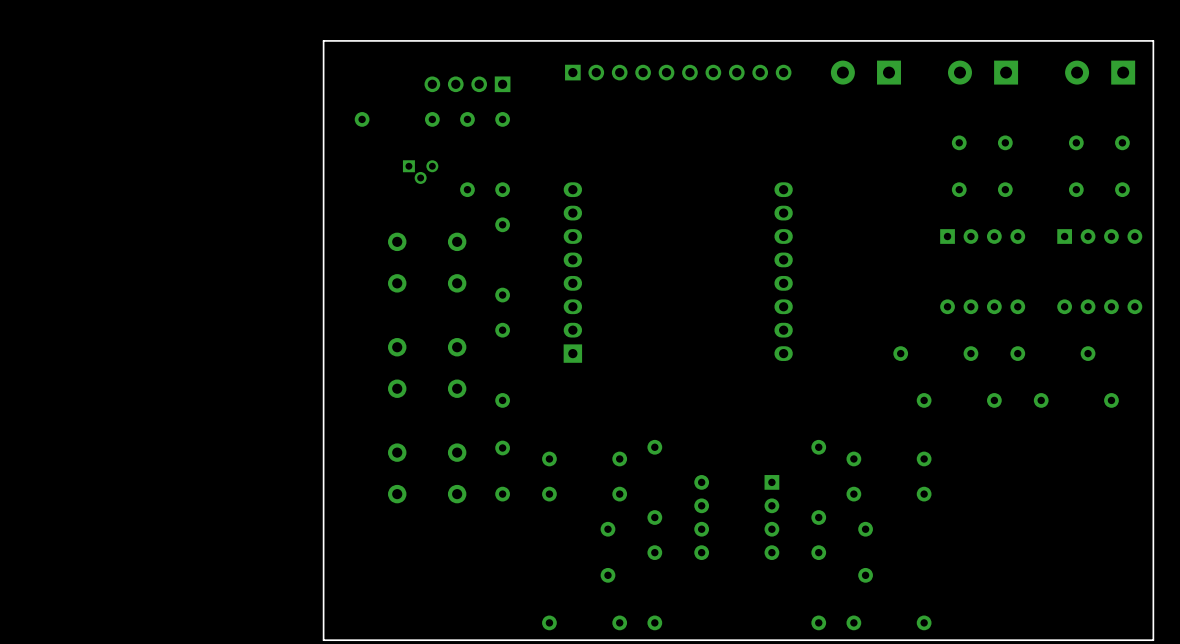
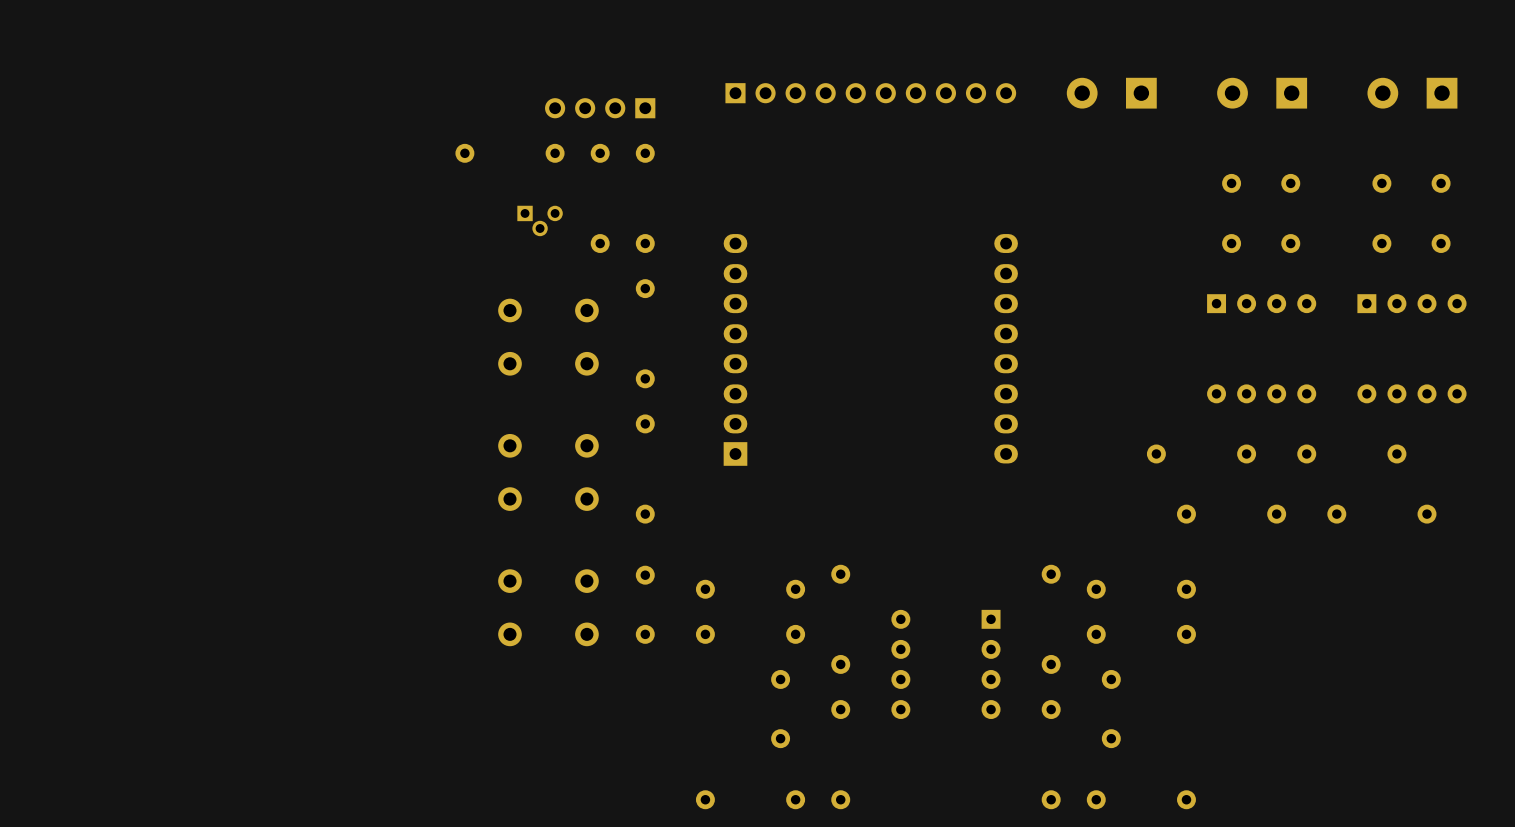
board edge: (1153, 40) (1153, 640) (323, 640) (323, 40) (1153, 40) -> none

